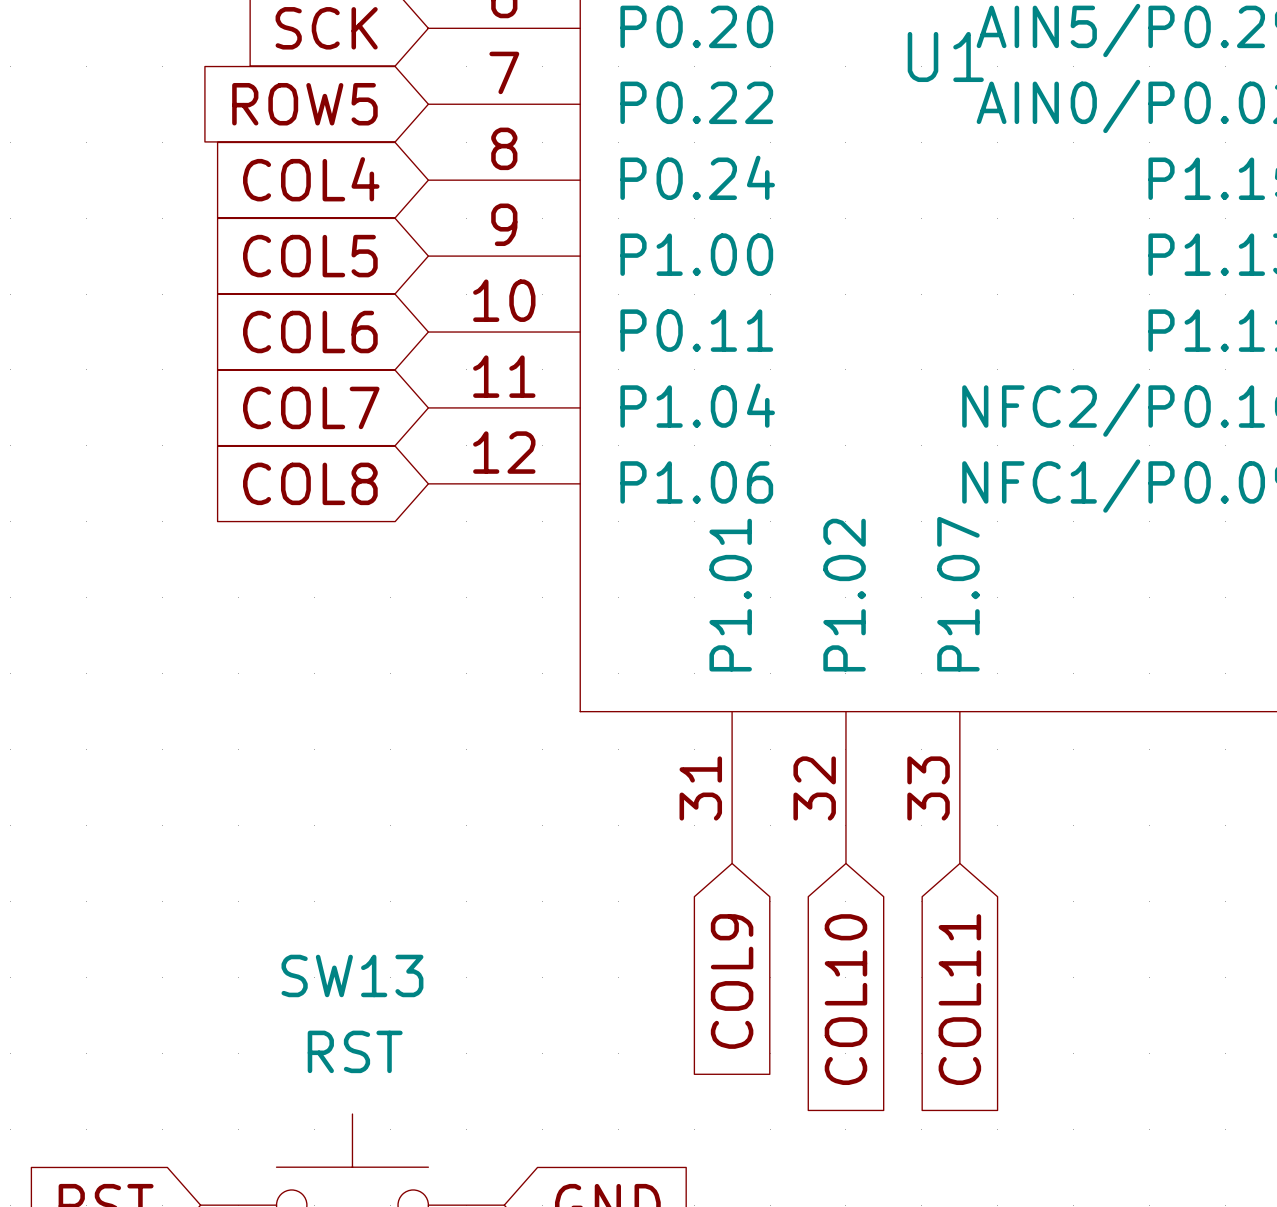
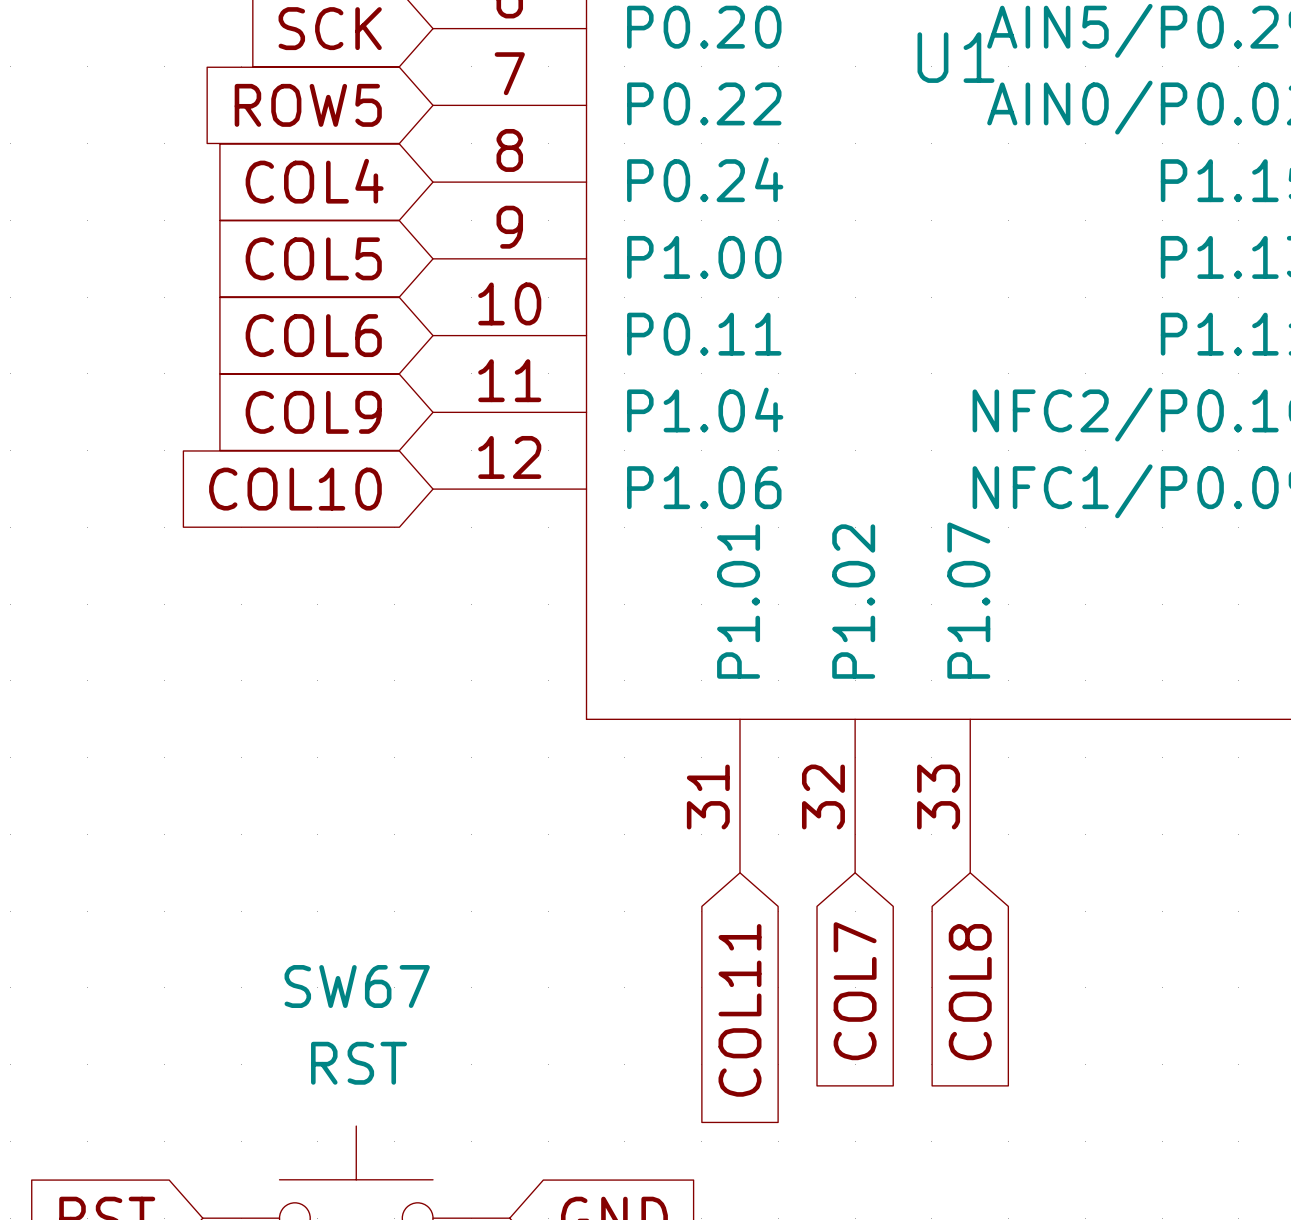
global label: COL7 (311, 407) -> COL9 (313, 412)
global label: COL8 (310, 483) -> COL10 (295, 489)
SW13 name: SW13 (352, 975) -> SW67 (357, 986)
global label: COL9 (732, 981) -> COL11 (739, 1010)
global label: COL10 (845, 999) -> COL7 (855, 991)
global label: COL11 (959, 999) -> COL8 (970, 992)

